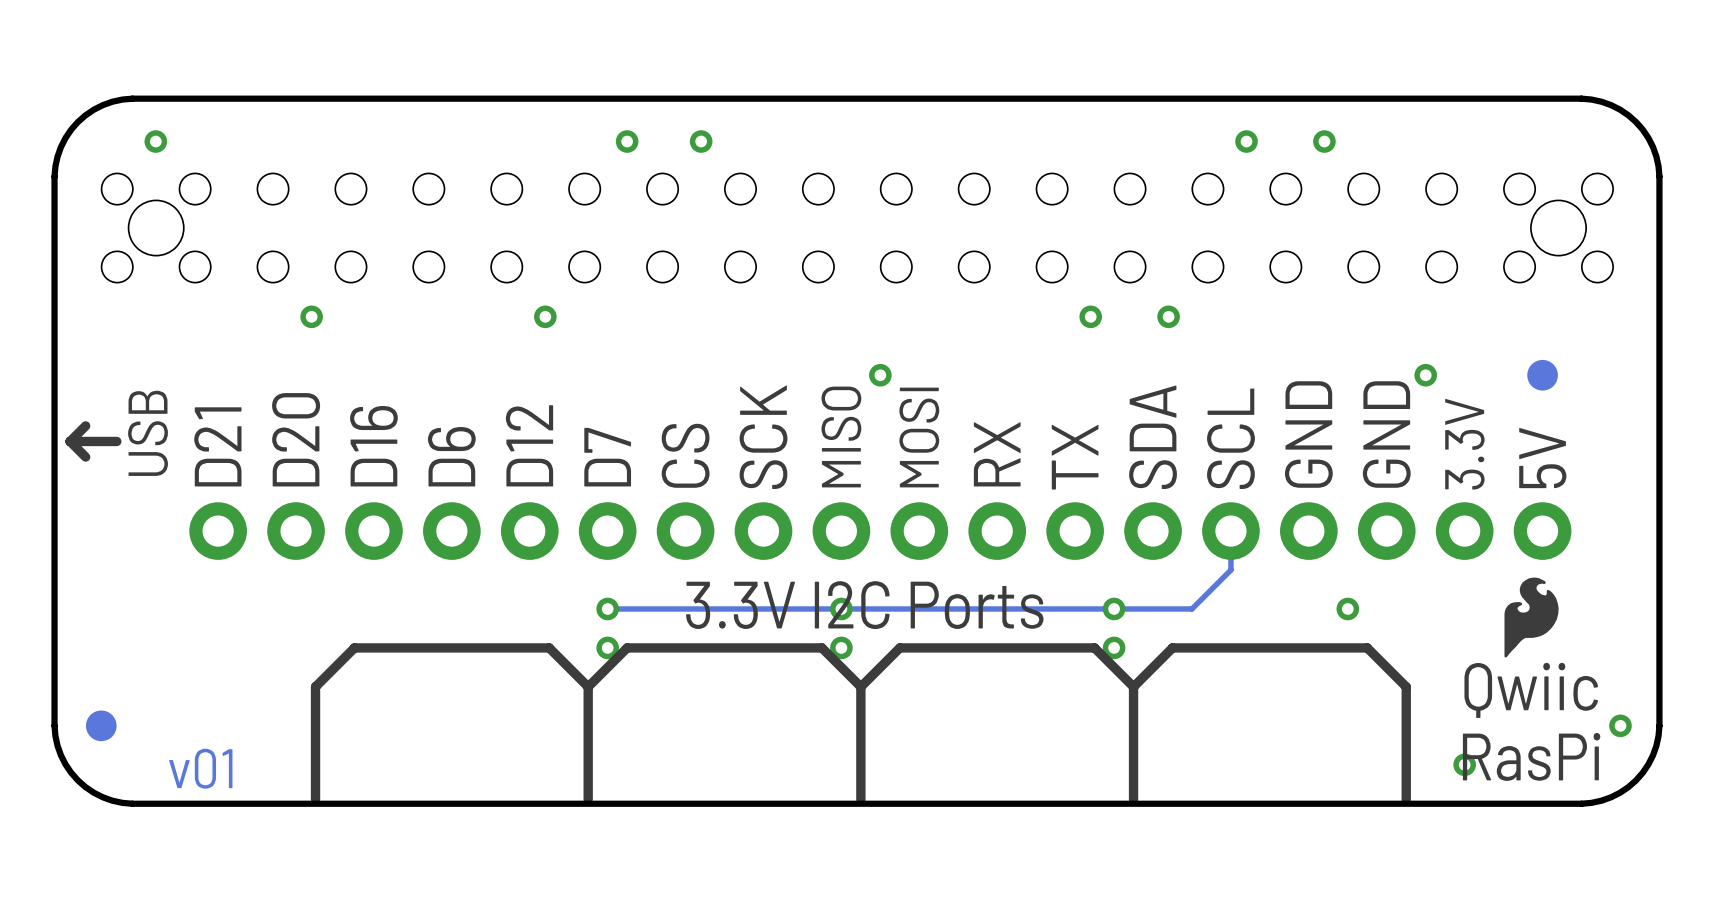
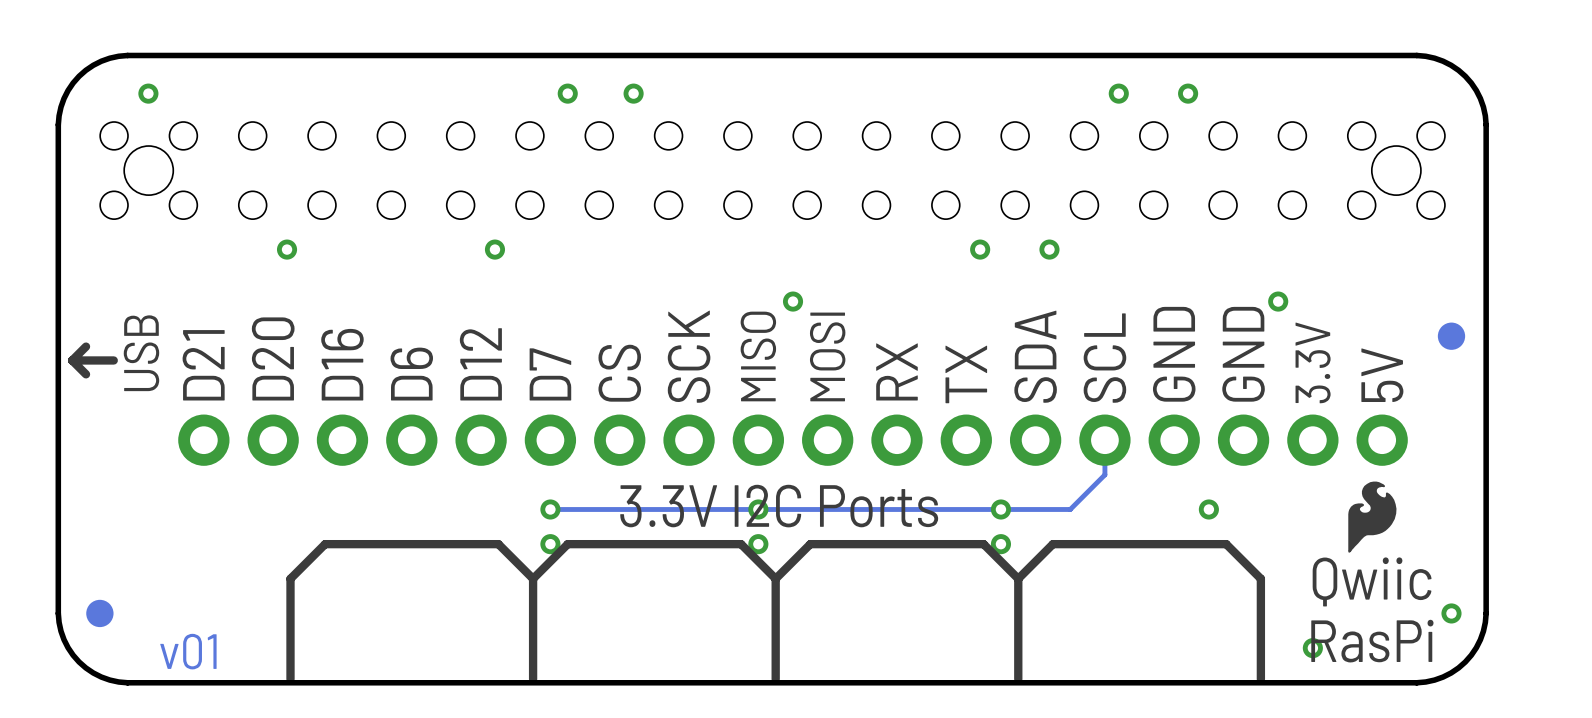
part position: (1542, 375) -> (1451, 336)

